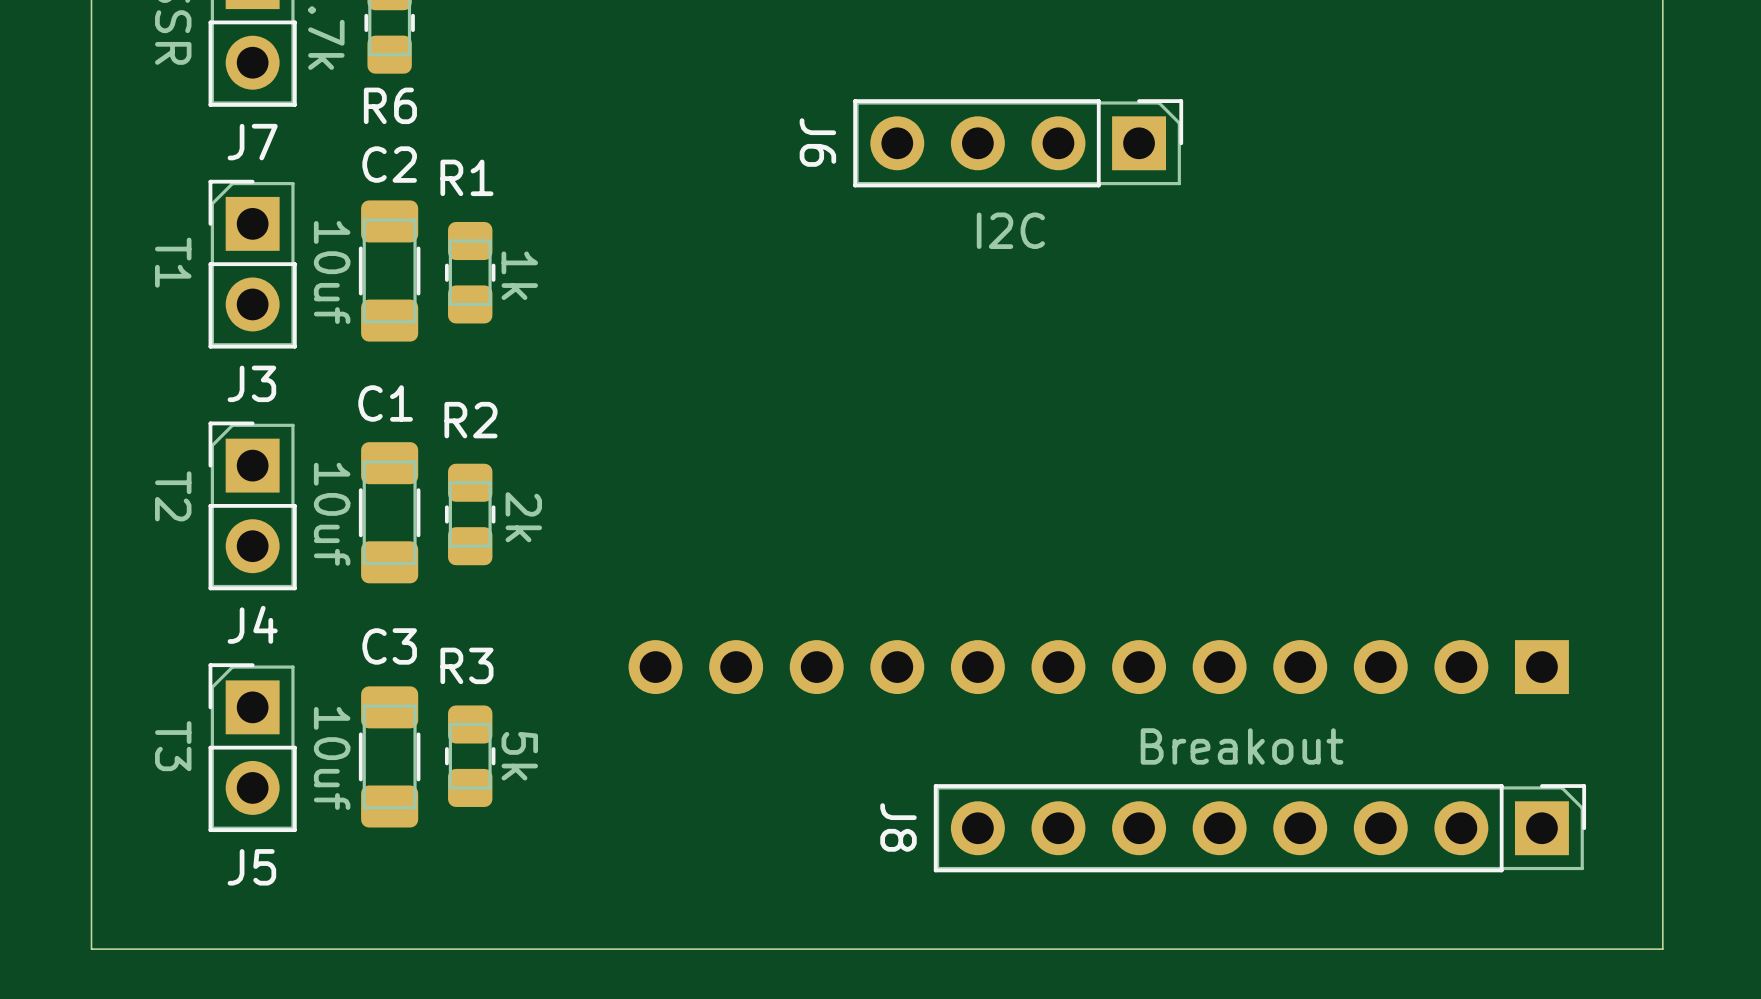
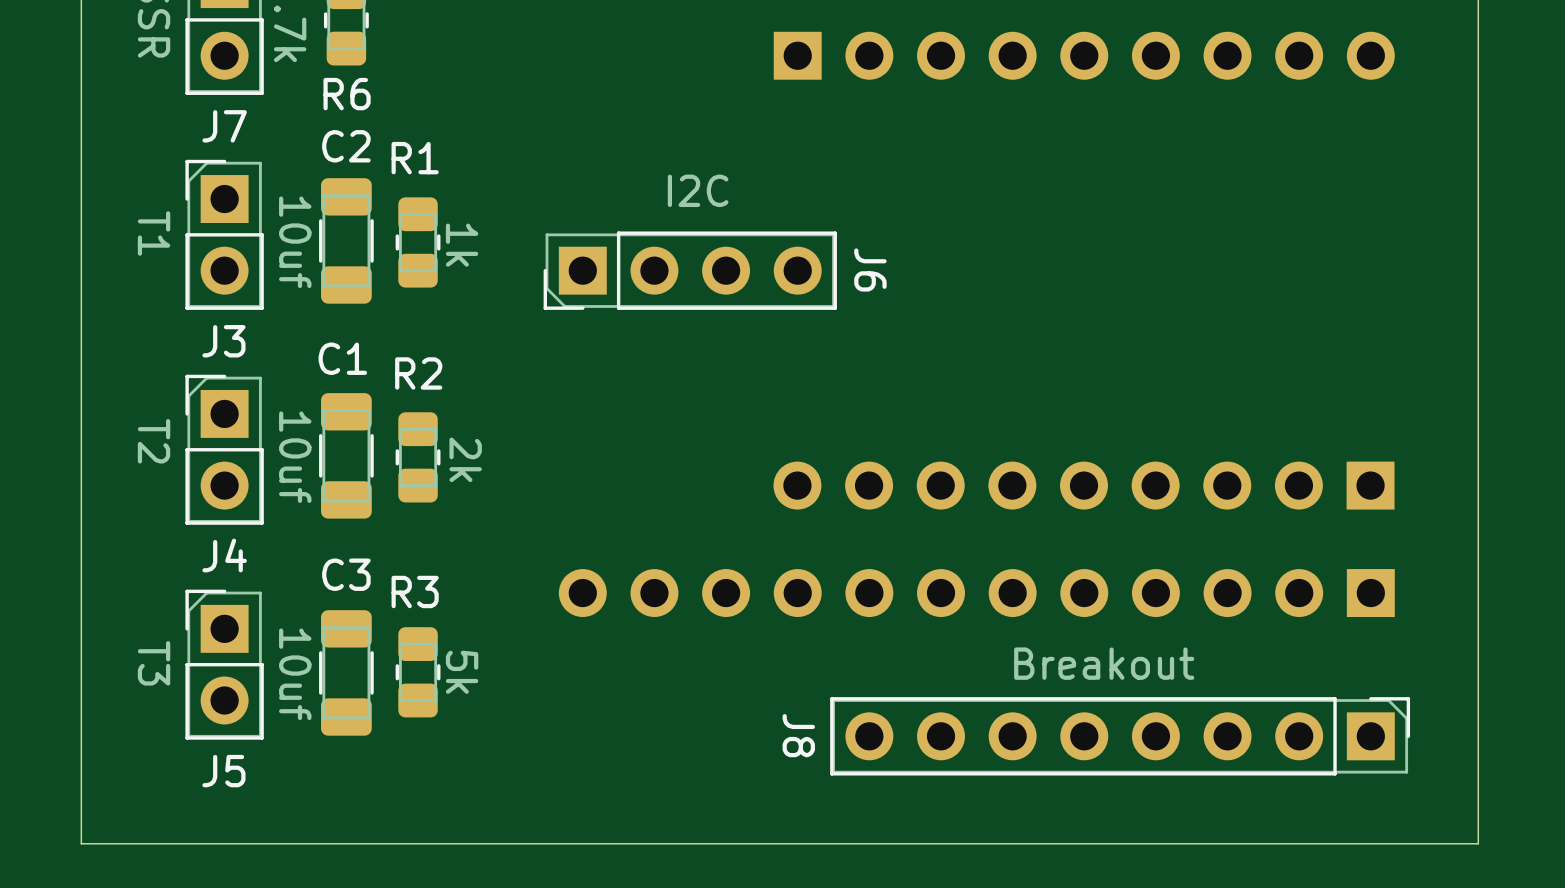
part: none -> (1084, 55)
J6 rotation: 0° (1018, 143) -> 180° (690, 270)
J6 position: (1018, 143) -> (690, 270)
part: none -> (1084, 485)

